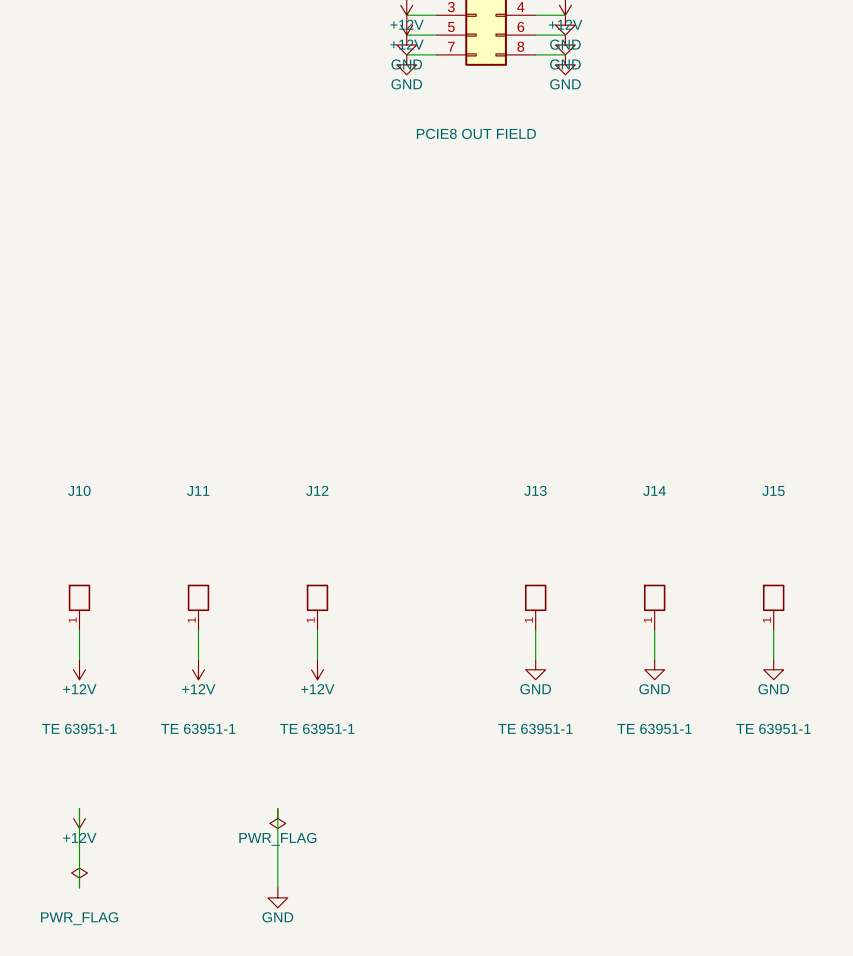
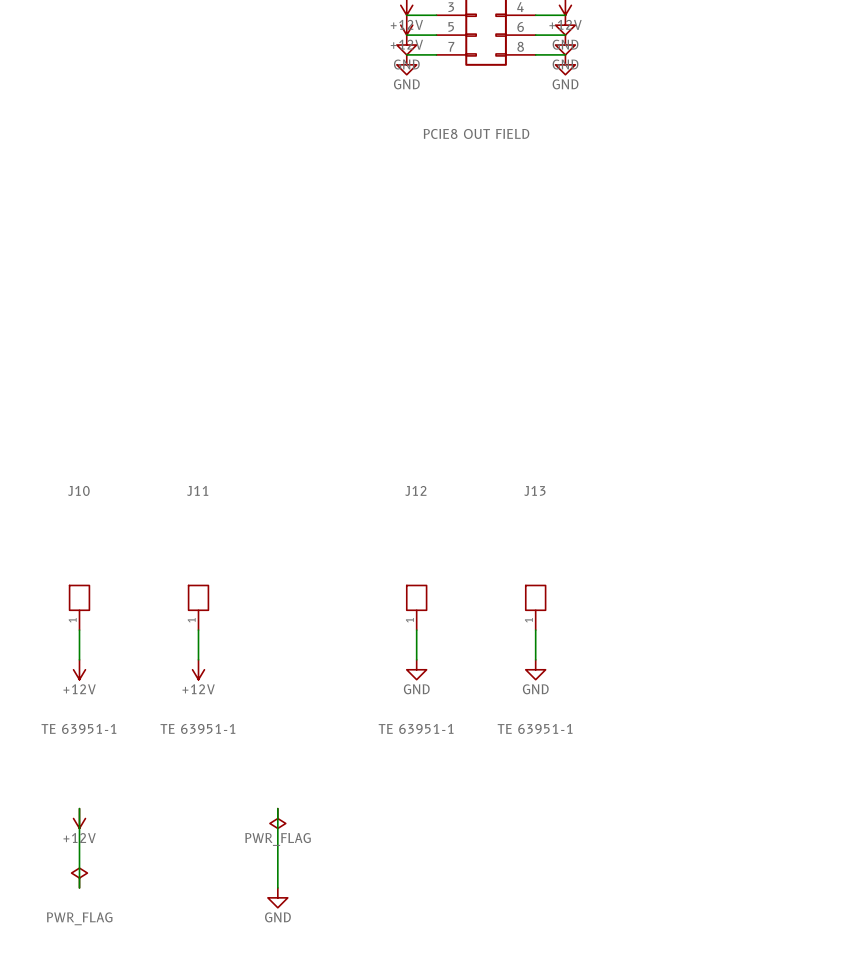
J12 position: (317, 607) -> (416, 607)
J14: TE 63951-1 (654, 607) -> none
J15: TE 63951-1 (773, 607) -> none
wire: (317, 630) (317, 659) -> (416, 630) (416, 659)
wire: (654, 630) (654, 659) -> none
wire: (773, 630) (773, 659) -> none
power symbol: +12V (317, 669) -> none
power symbol: none -> GND (416, 669)
power symbol: GND (654, 669) -> none
power symbol: GND (773, 669) -> none

